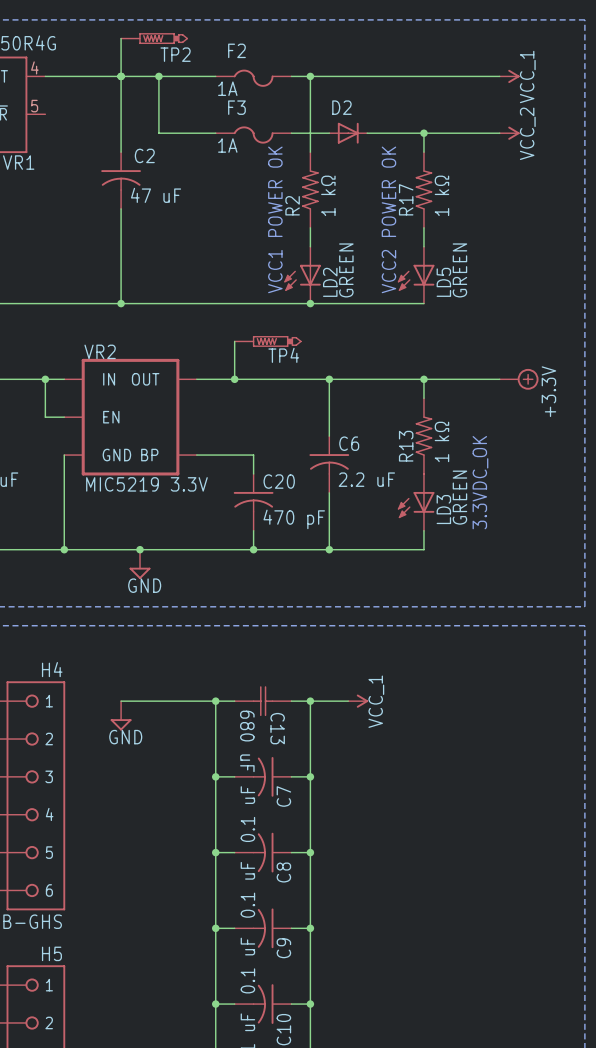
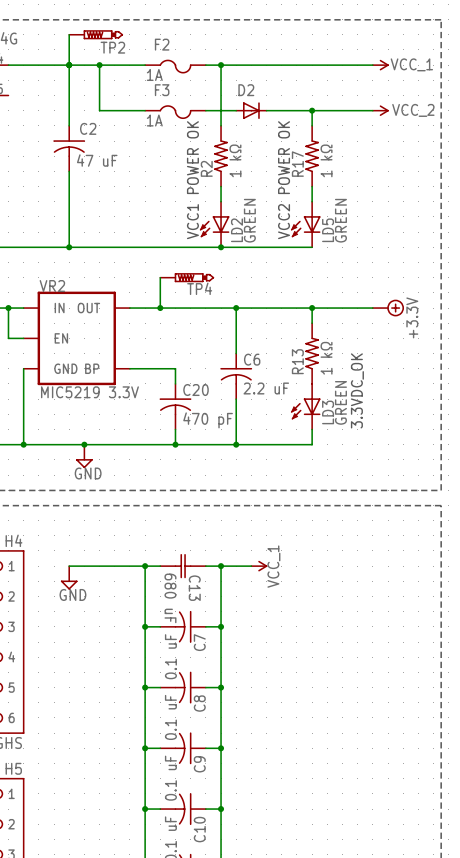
power symbol text rotation: 0° (527, 76) -> 90° clockwise (411, 64)
power symbol text rotation: 0° (527, 133) -> 90° clockwise (413, 110)

